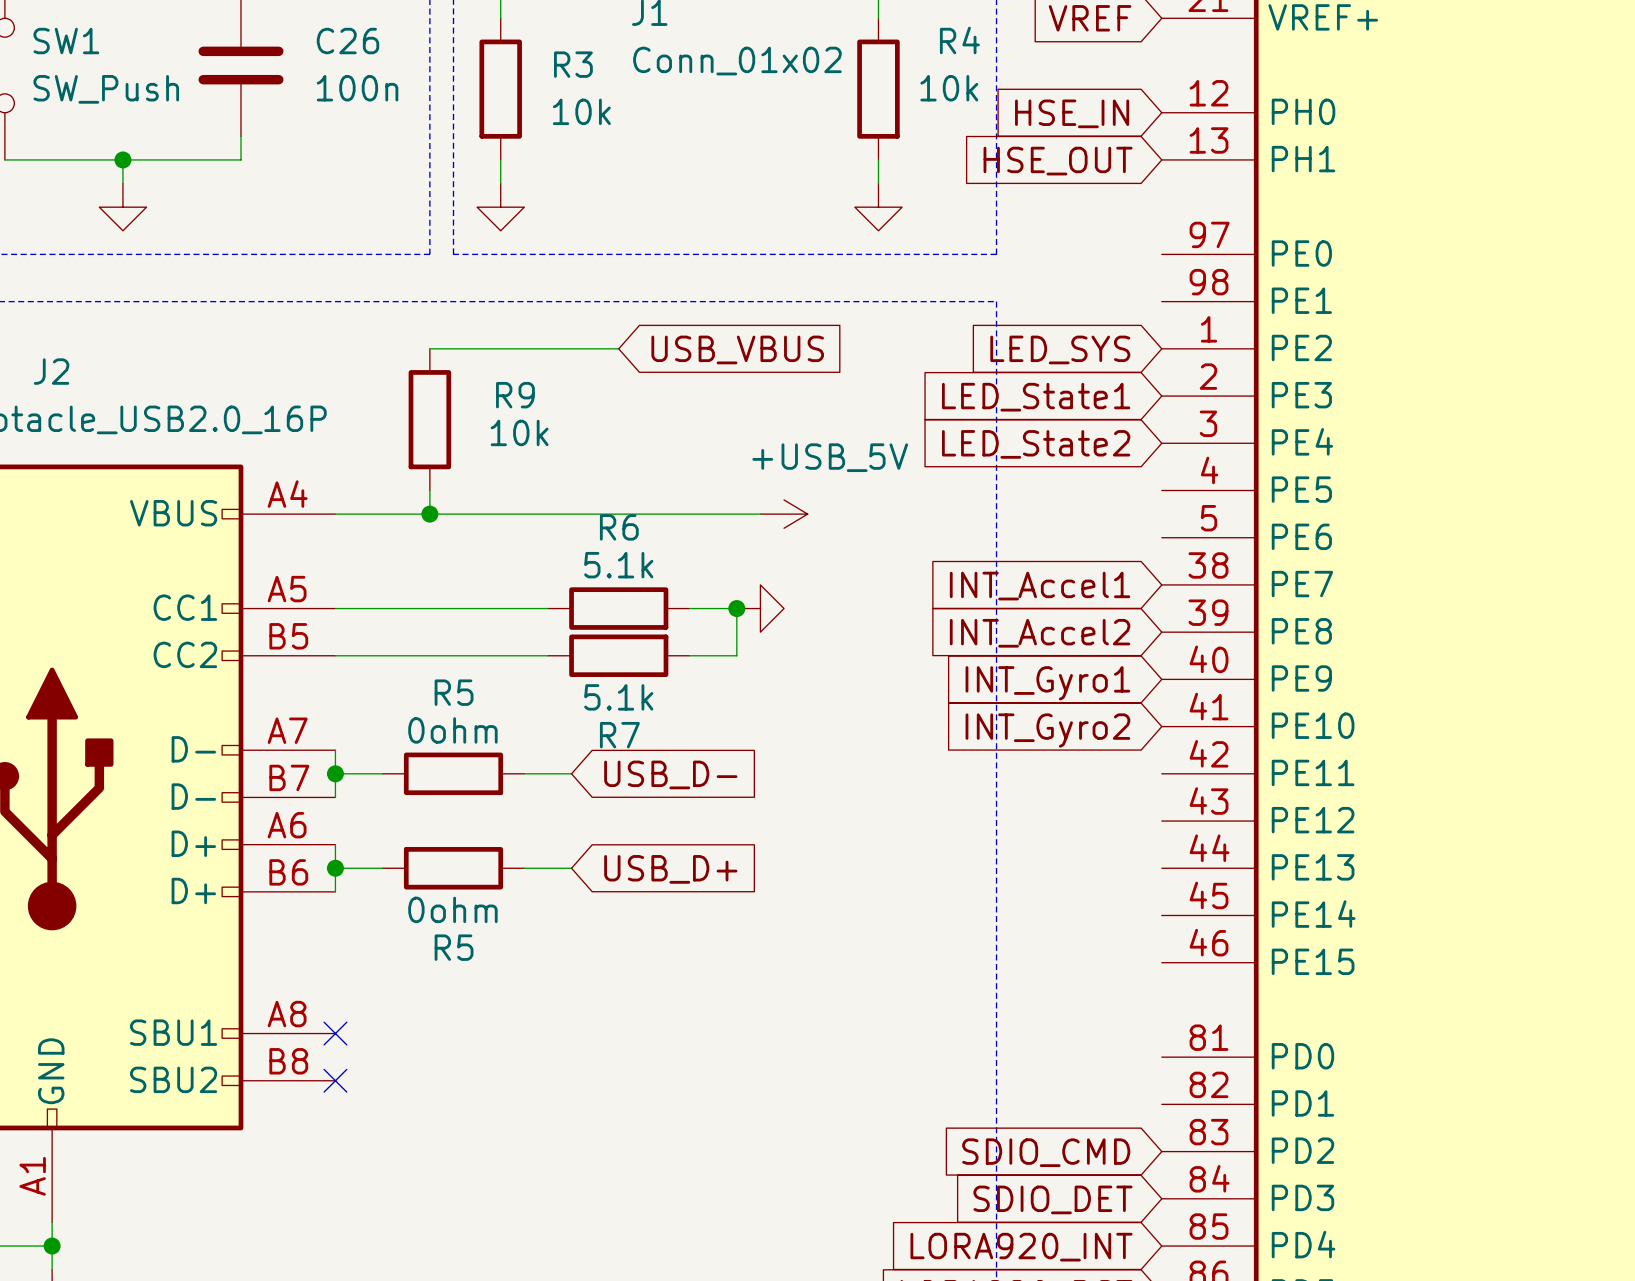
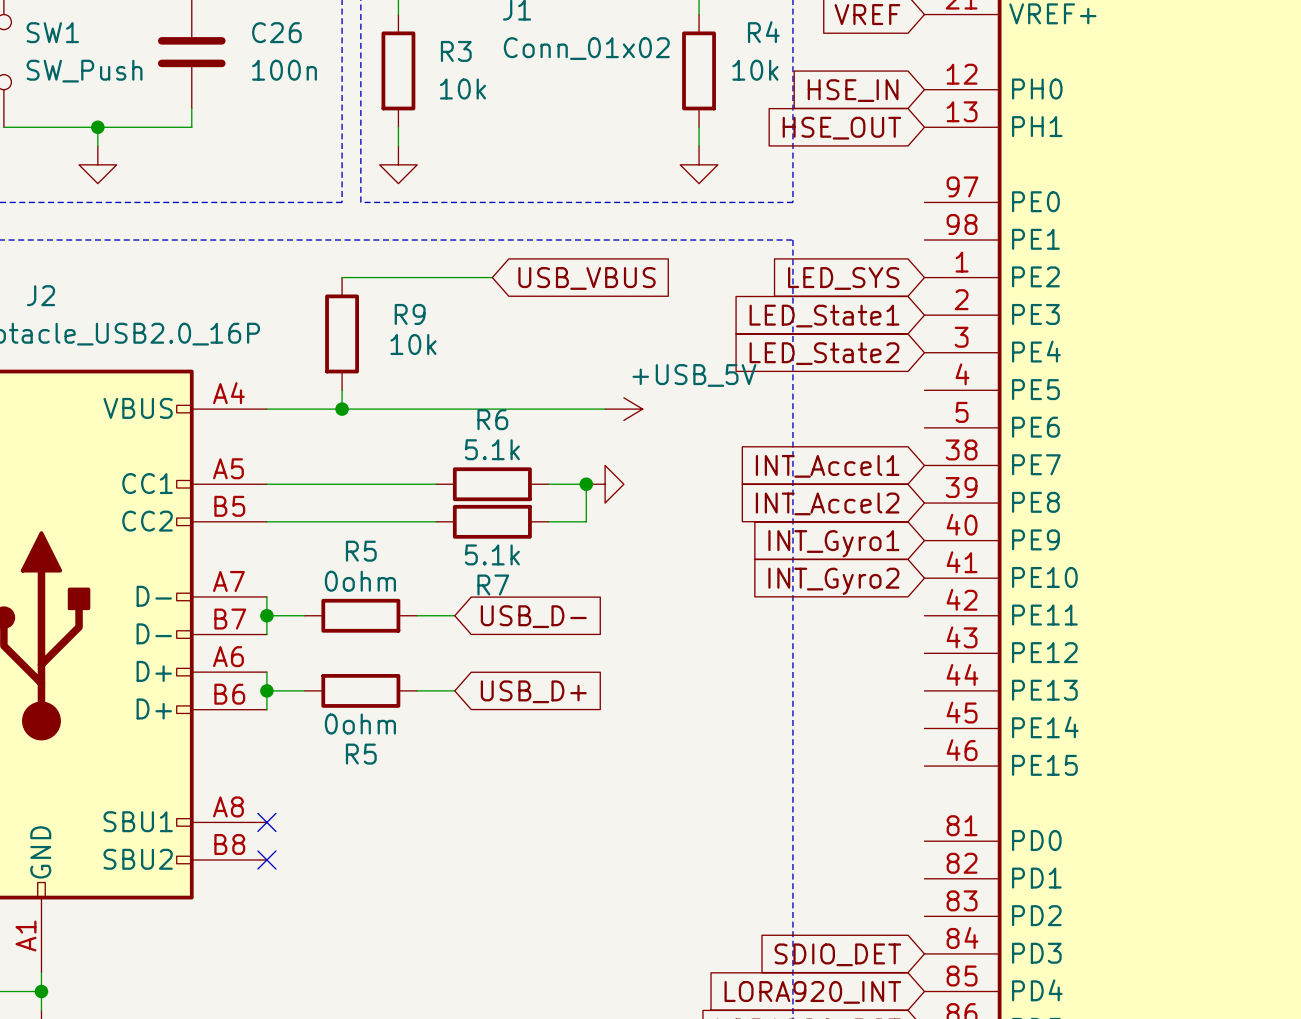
power symbol text position: +USB_5V (830, 457) -> +USB_5V (694, 375)
global label: SDIO_CMD (1046, 1152) -> none

